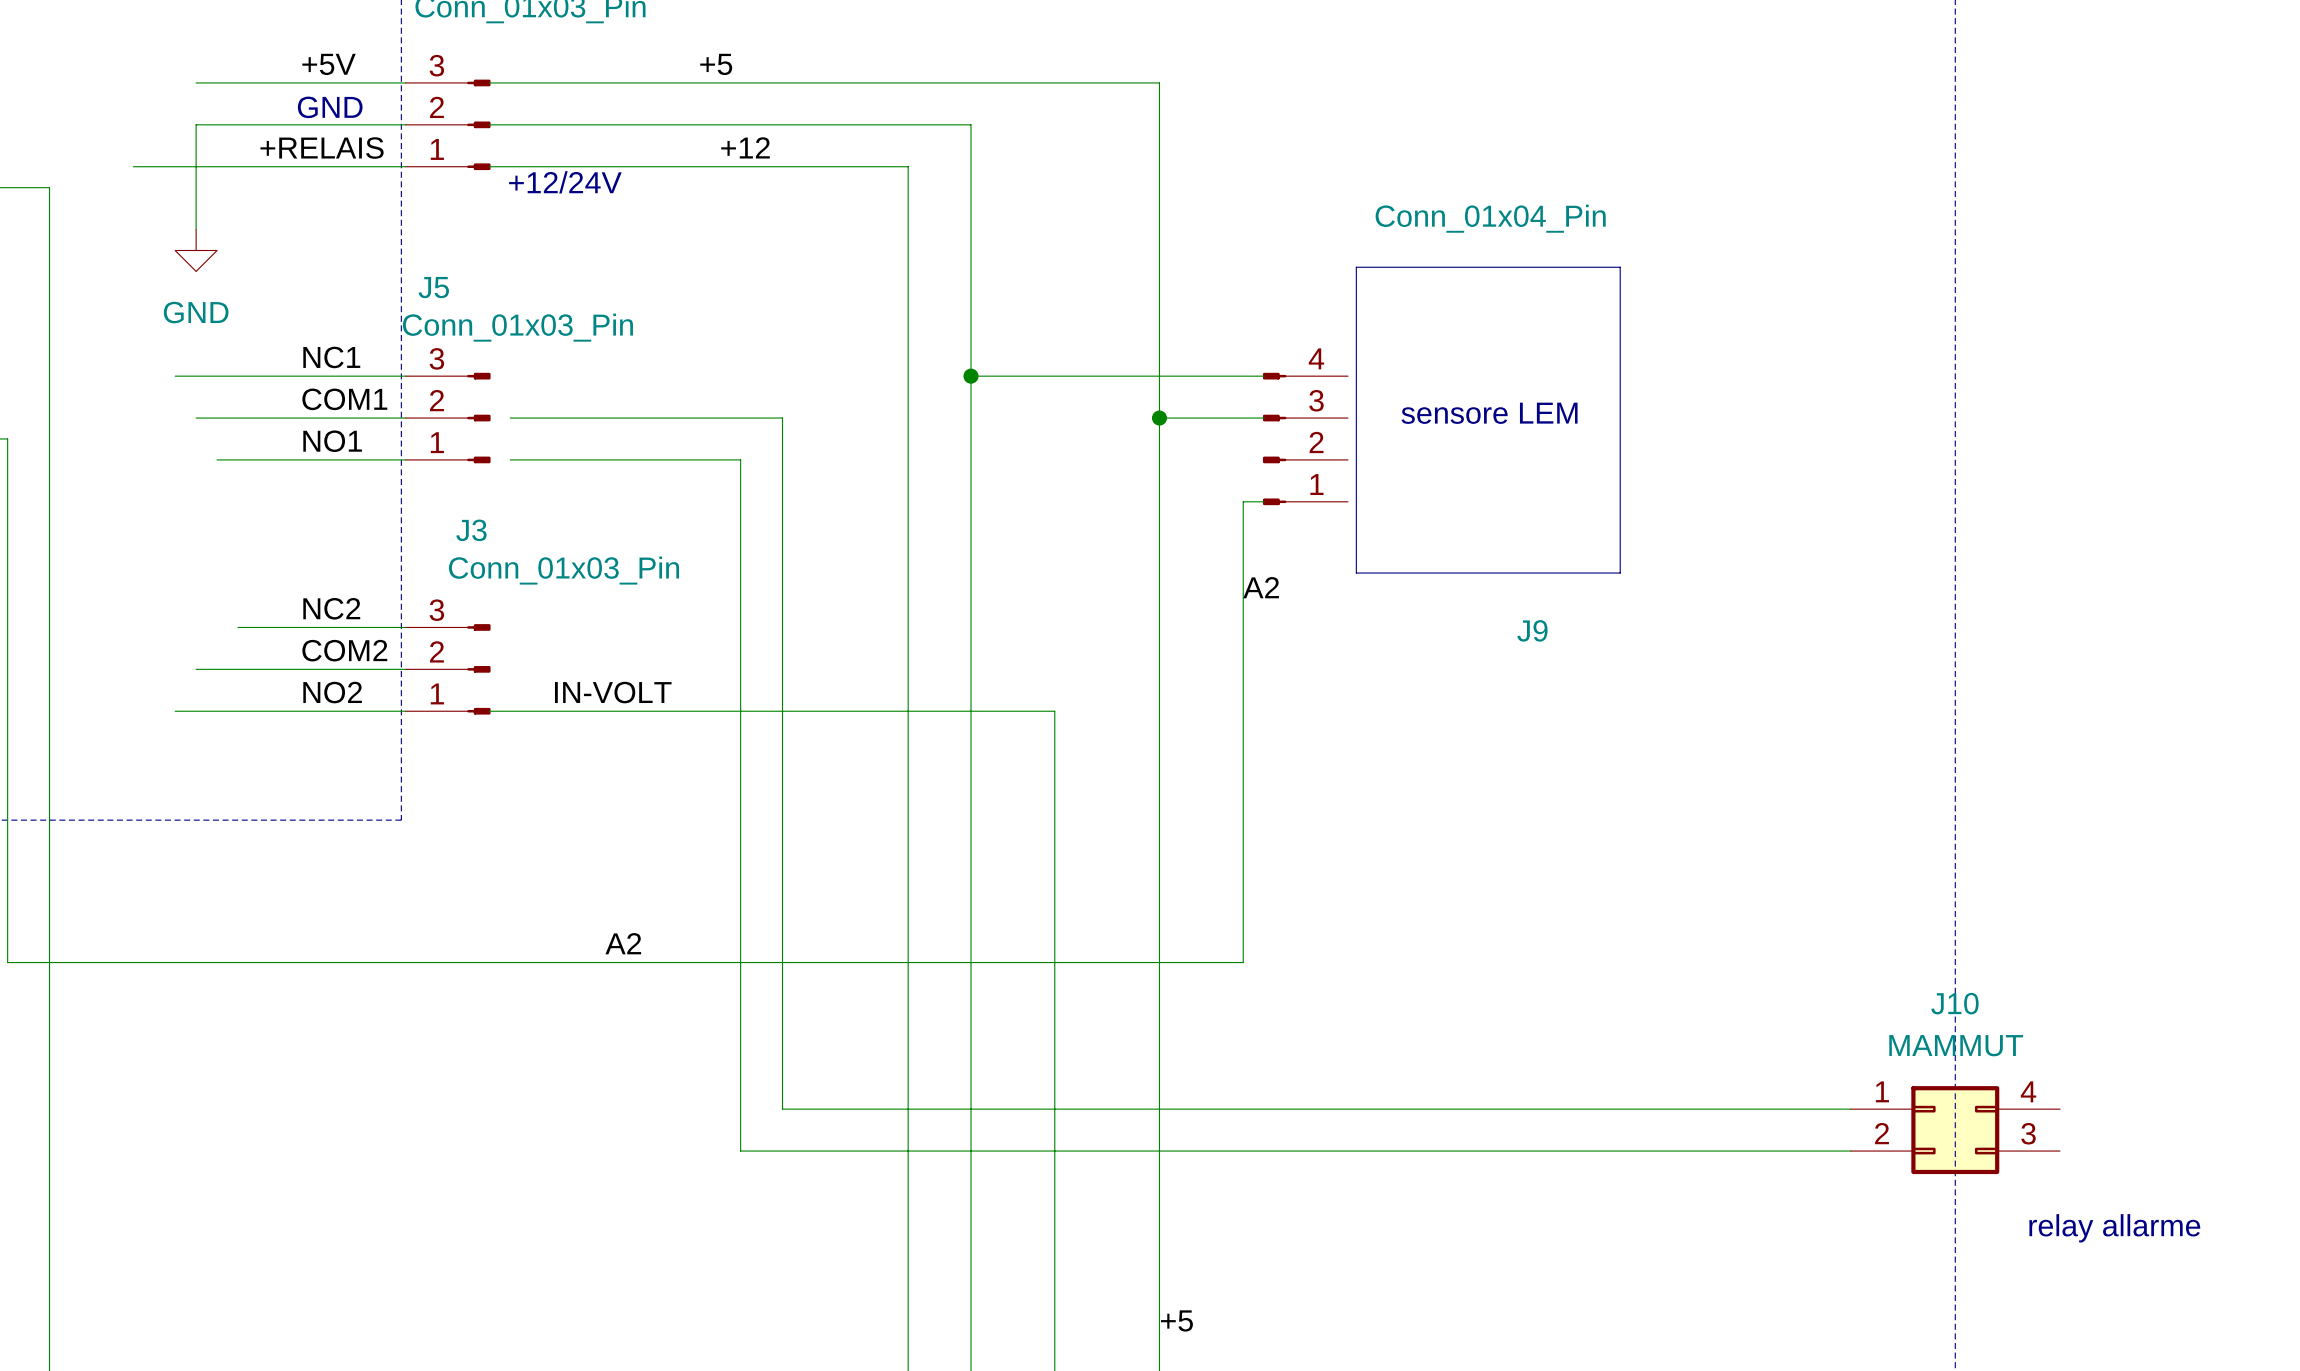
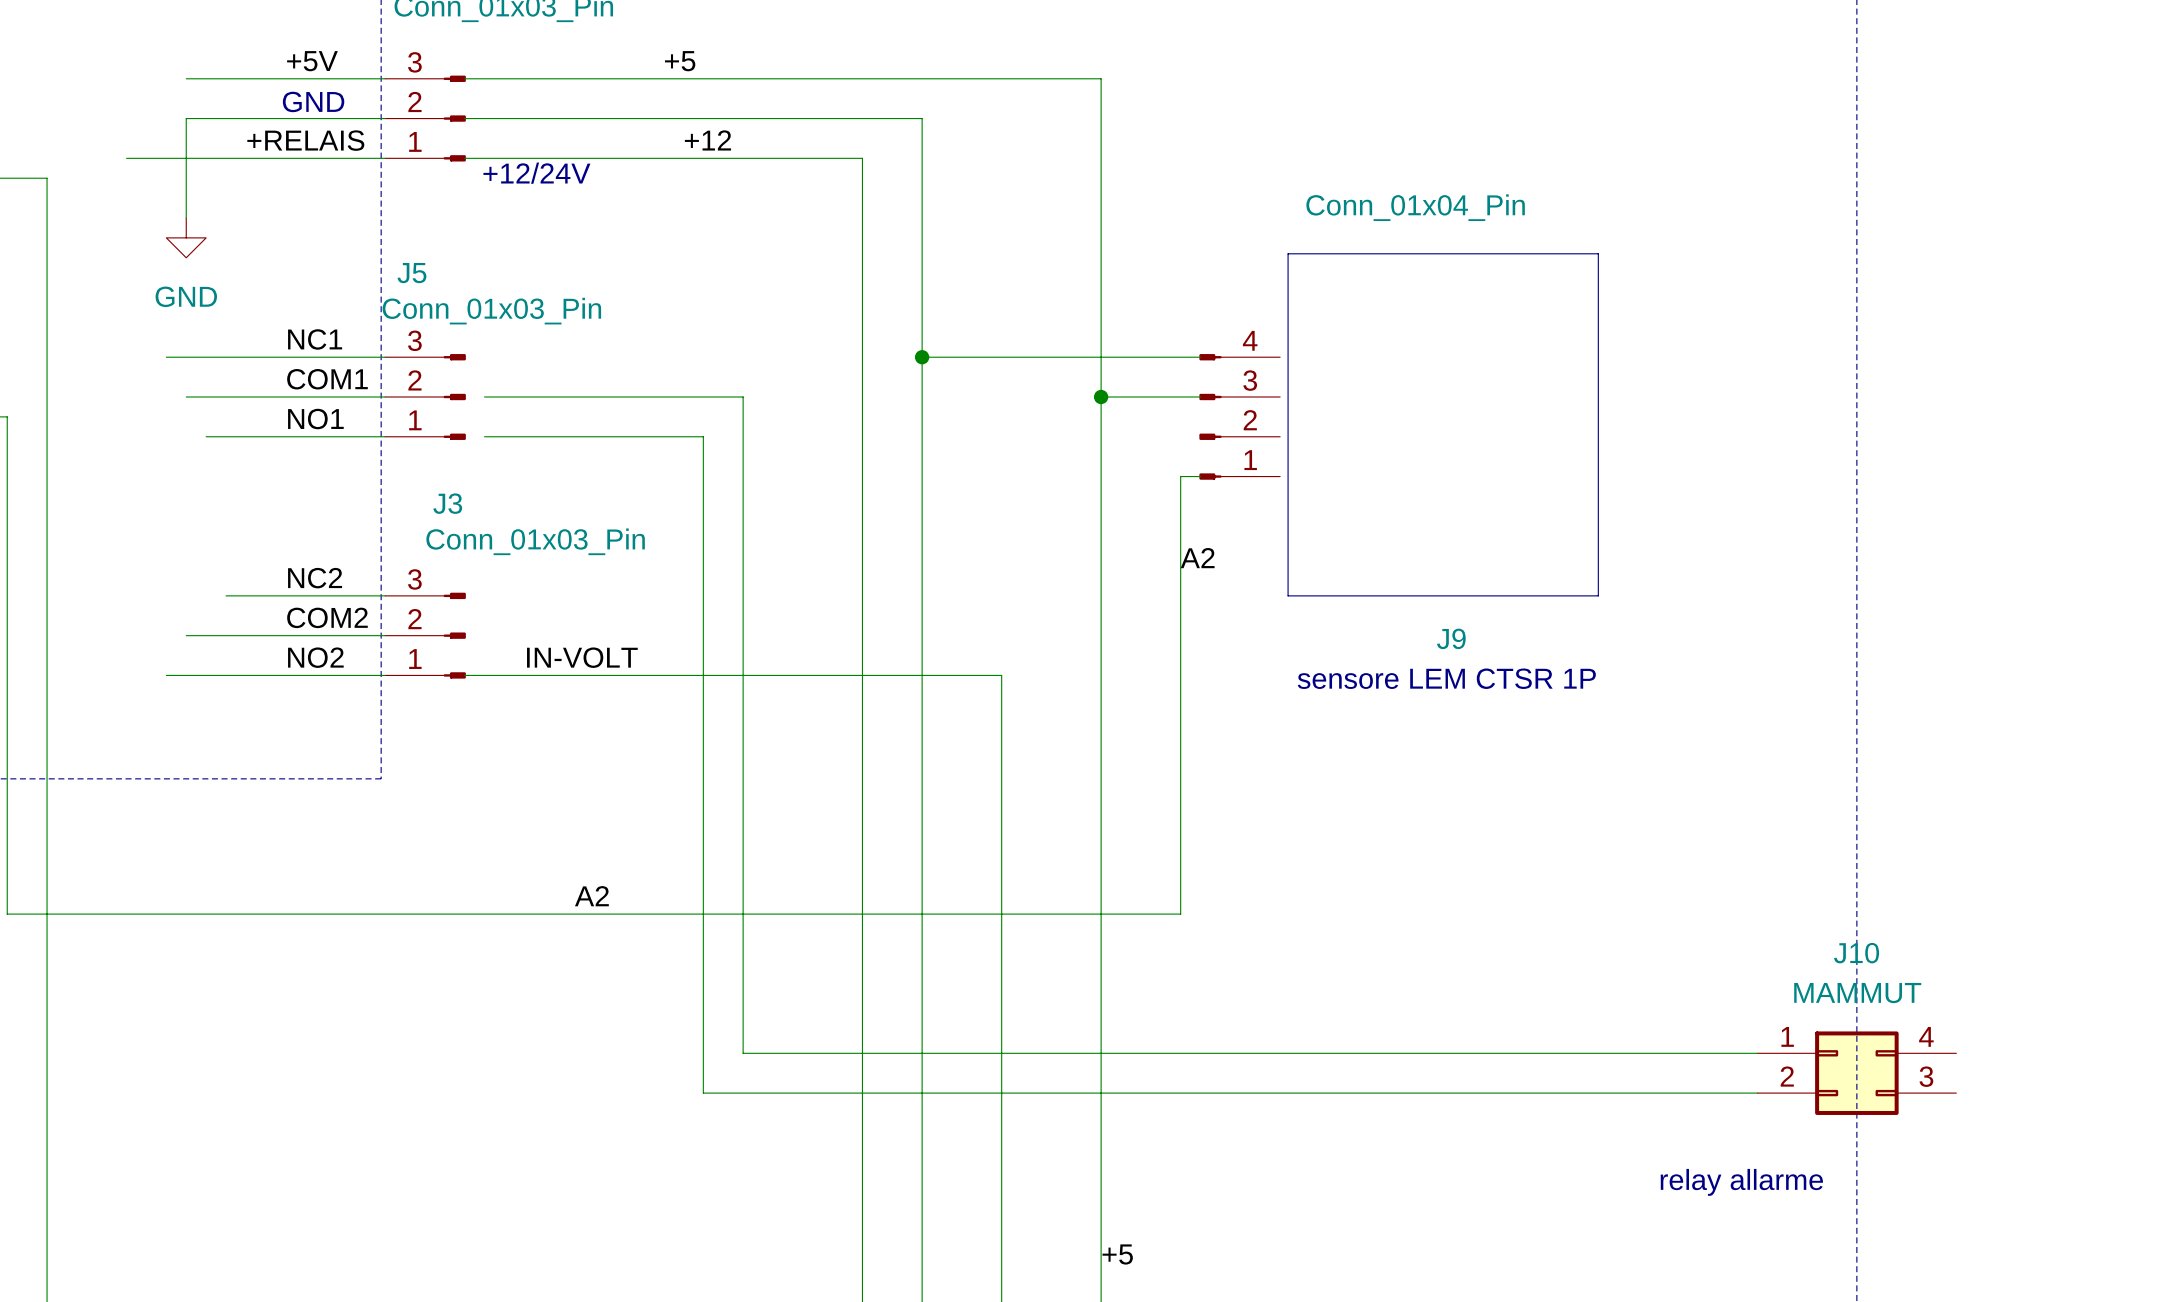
line: (1620, 267) (1620, 573) (1356, 573) -> (1538, 253) (1598, 253) (1598, 595) (1288, 595) (1288, 544)
text: sensore LEM (1489, 413) -> none
J9 name position: J9 (1532, 630) -> J9 (1451, 638)
text: none -> sensore LEM CTSR 1P (1446, 678)
text position: relay allarme (2114, 1228) -> relay allarme (1741, 1182)

